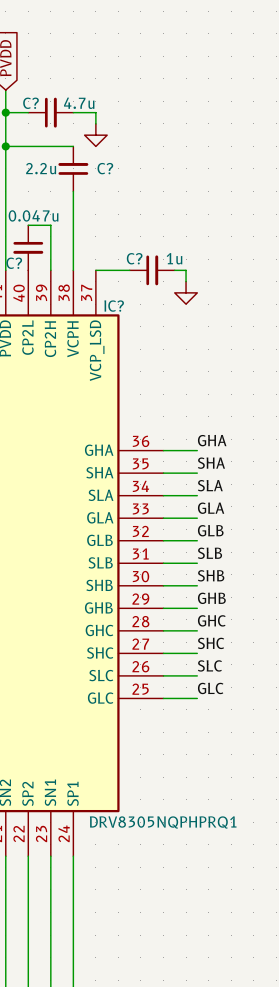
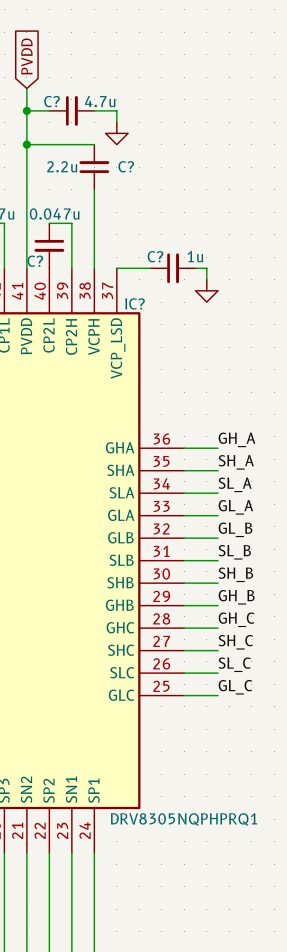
label: GHA (212, 440) -> GH_A (236, 439)
label: SHA (211, 463) -> SH_A (236, 462)
label: SLA (210, 485) -> SL_A (235, 484)
label: GLA (211, 508) -> GL_A (235, 507)
label: GLB (210, 530) -> GL_B (235, 529)
label: SLB (209, 553) -> SL_B (234, 552)
label: SHB (211, 575) -> SH_B (235, 574)
label: GHB (211, 598) -> GH_B (236, 597)
label: GHC (211, 620) -> GH_C (236, 619)
label: SHC (211, 643) -> SH_C (235, 642)
label: SLC (209, 665) -> SL_C (234, 664)
label: GLC (210, 688) -> GL_C (235, 687)

